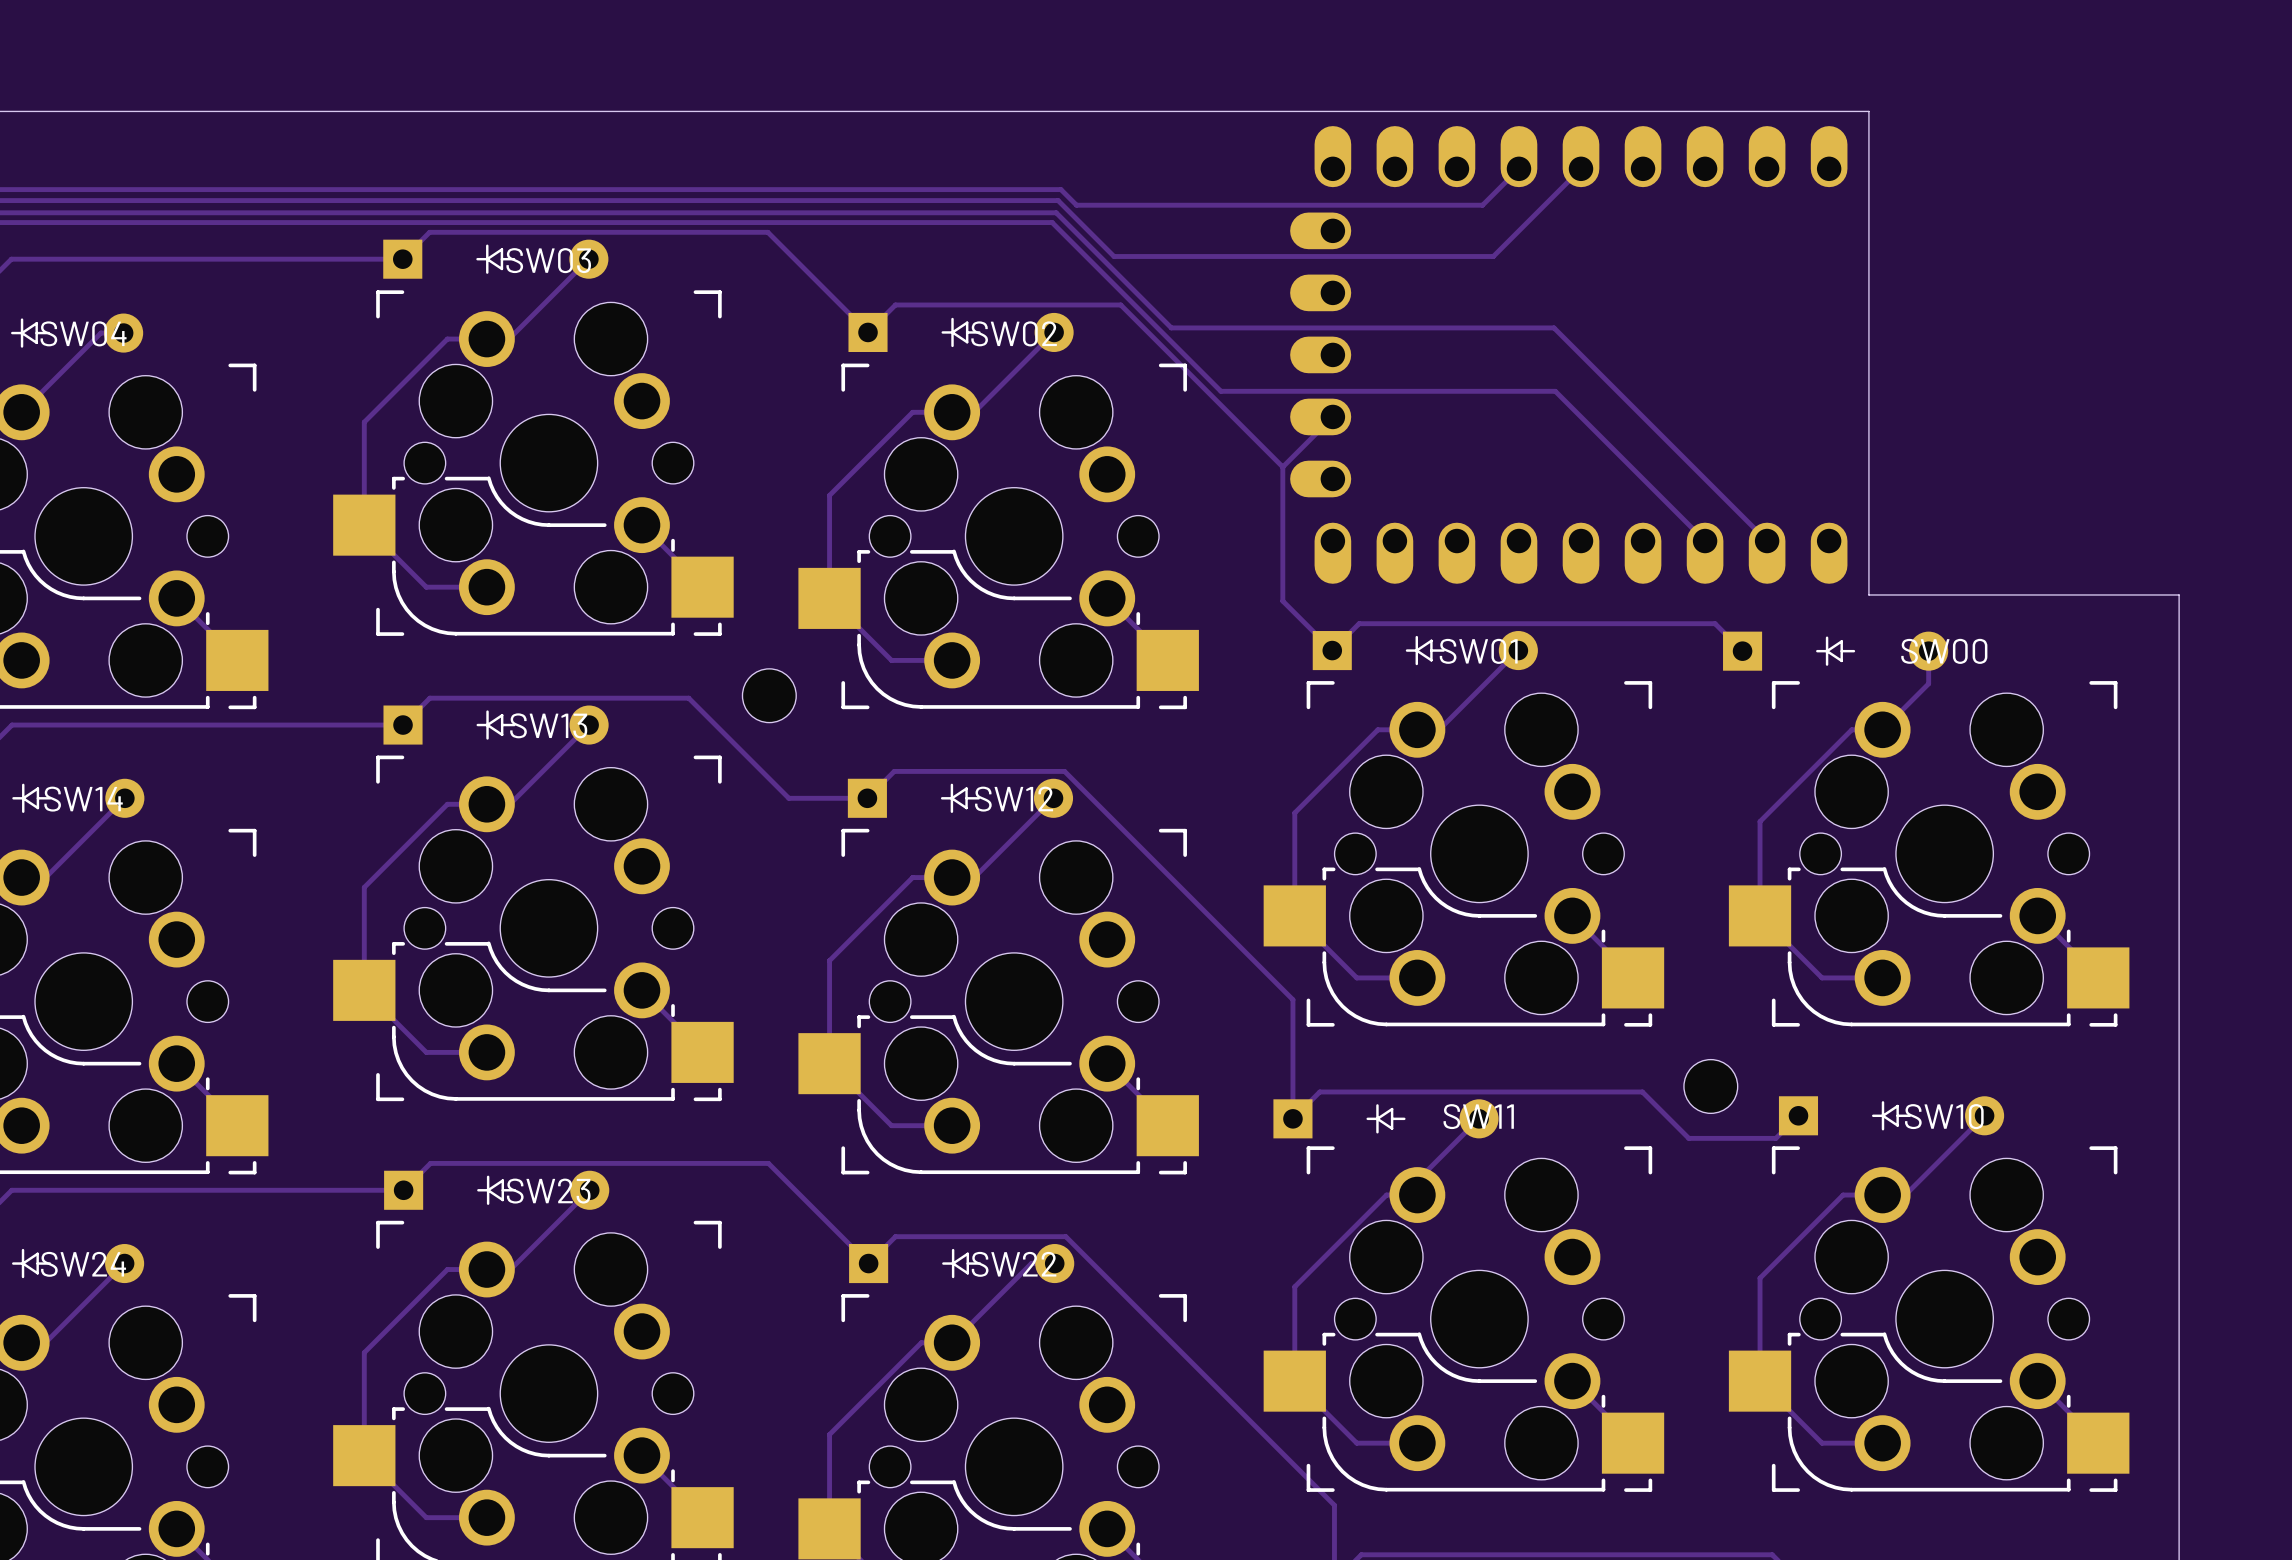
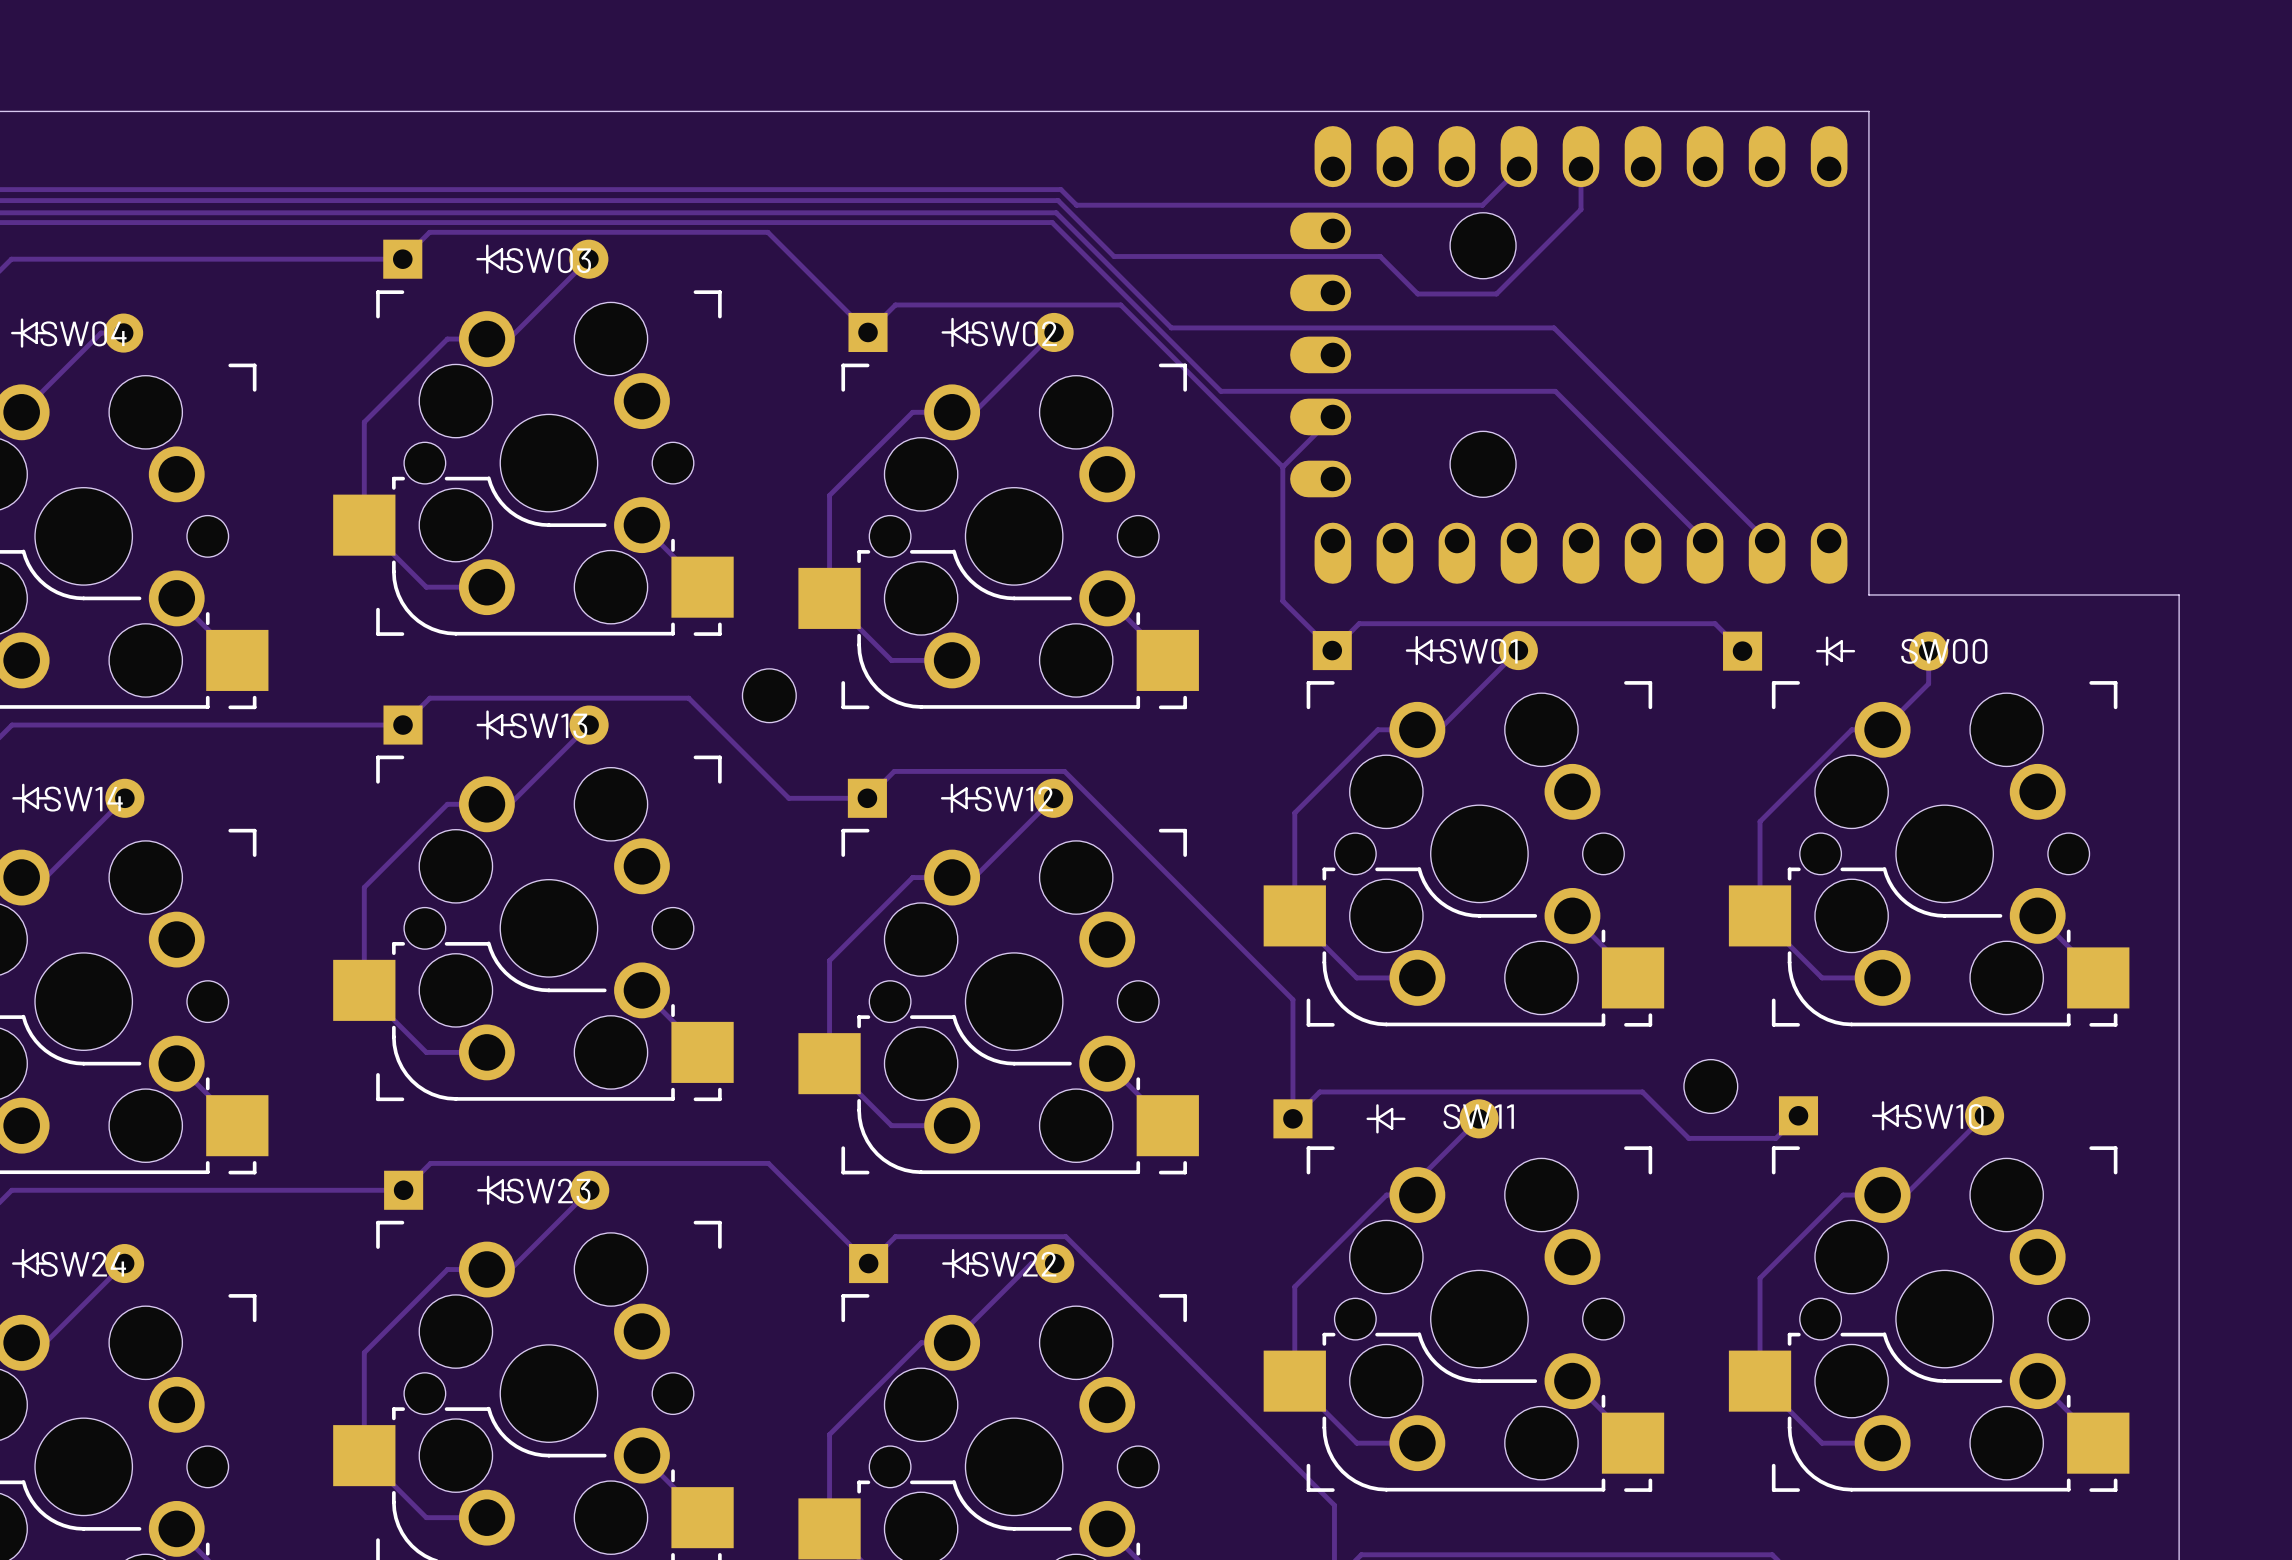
track: (1581, 168) (1493, 256) (1380, 256) -> (1581, 168) (1581, 209) (1496, 293) (1417, 293) (1380, 256)
part: none -> (1483, 245)
part: none -> (1483, 464)

